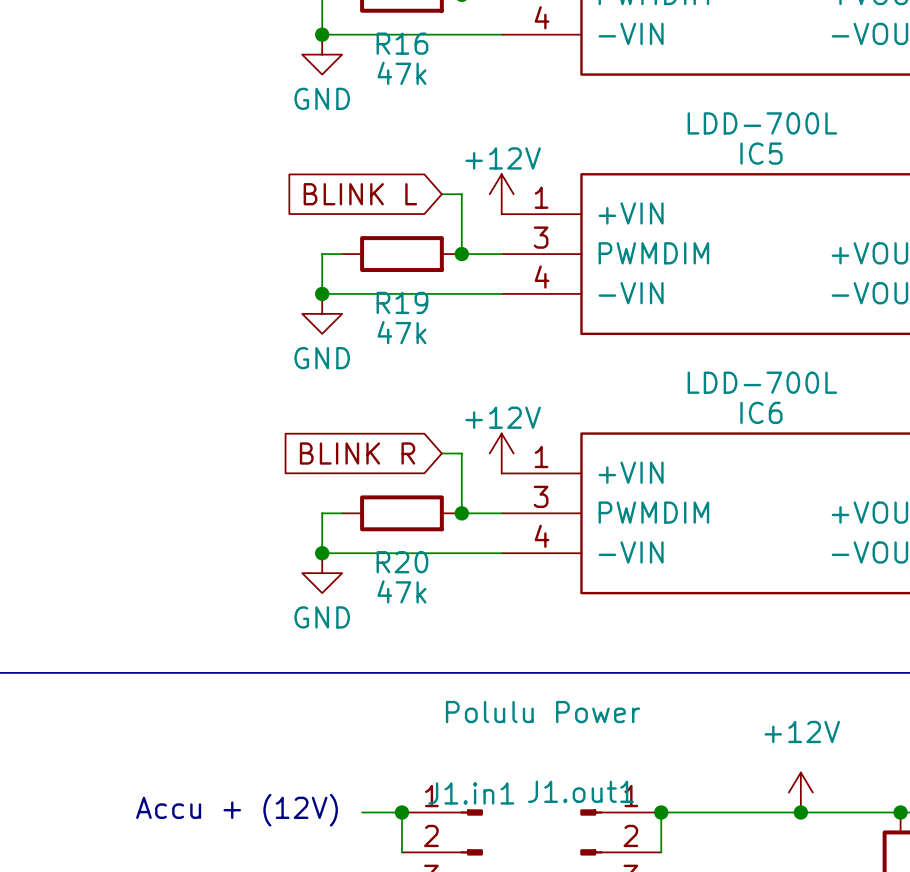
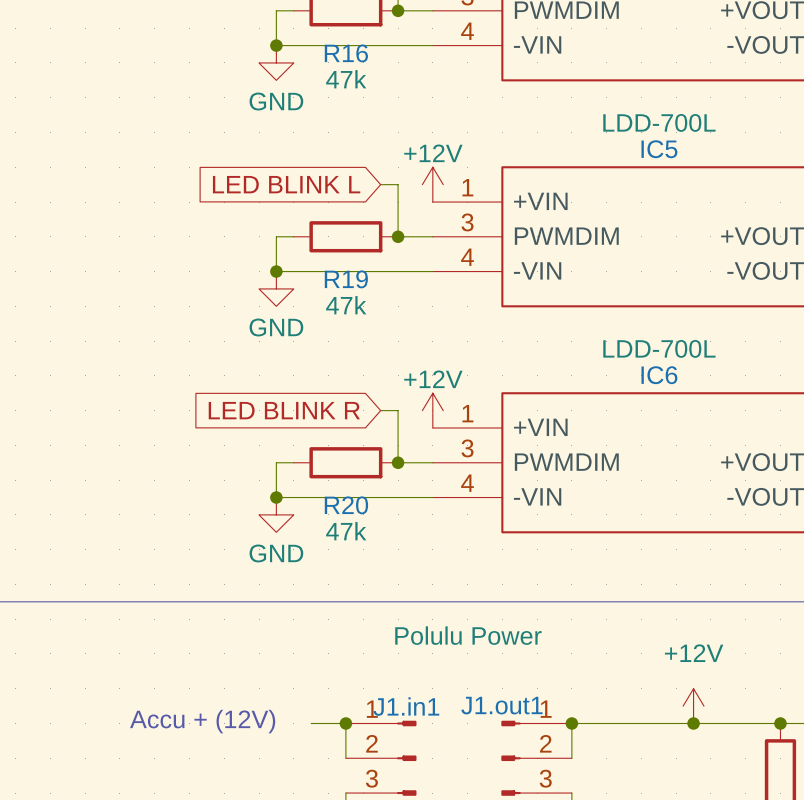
global label: BLINK L (360, 194) -> LED BLINK L (286, 184)
global label: BLINK R (357, 453) -> LED BLINK R (284, 410)

